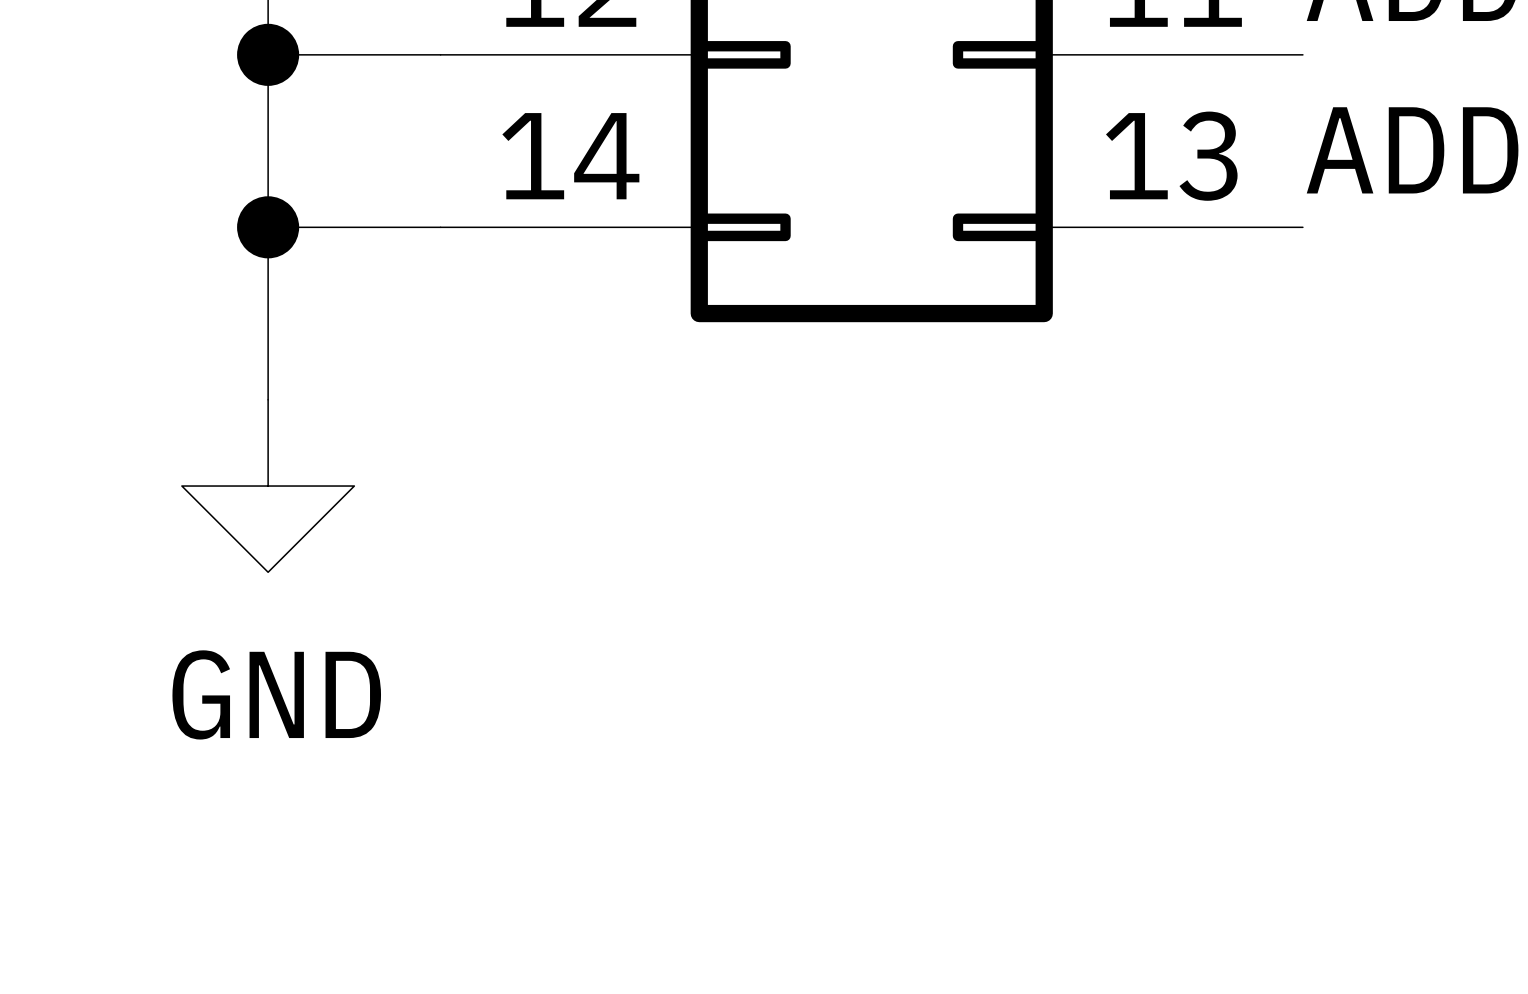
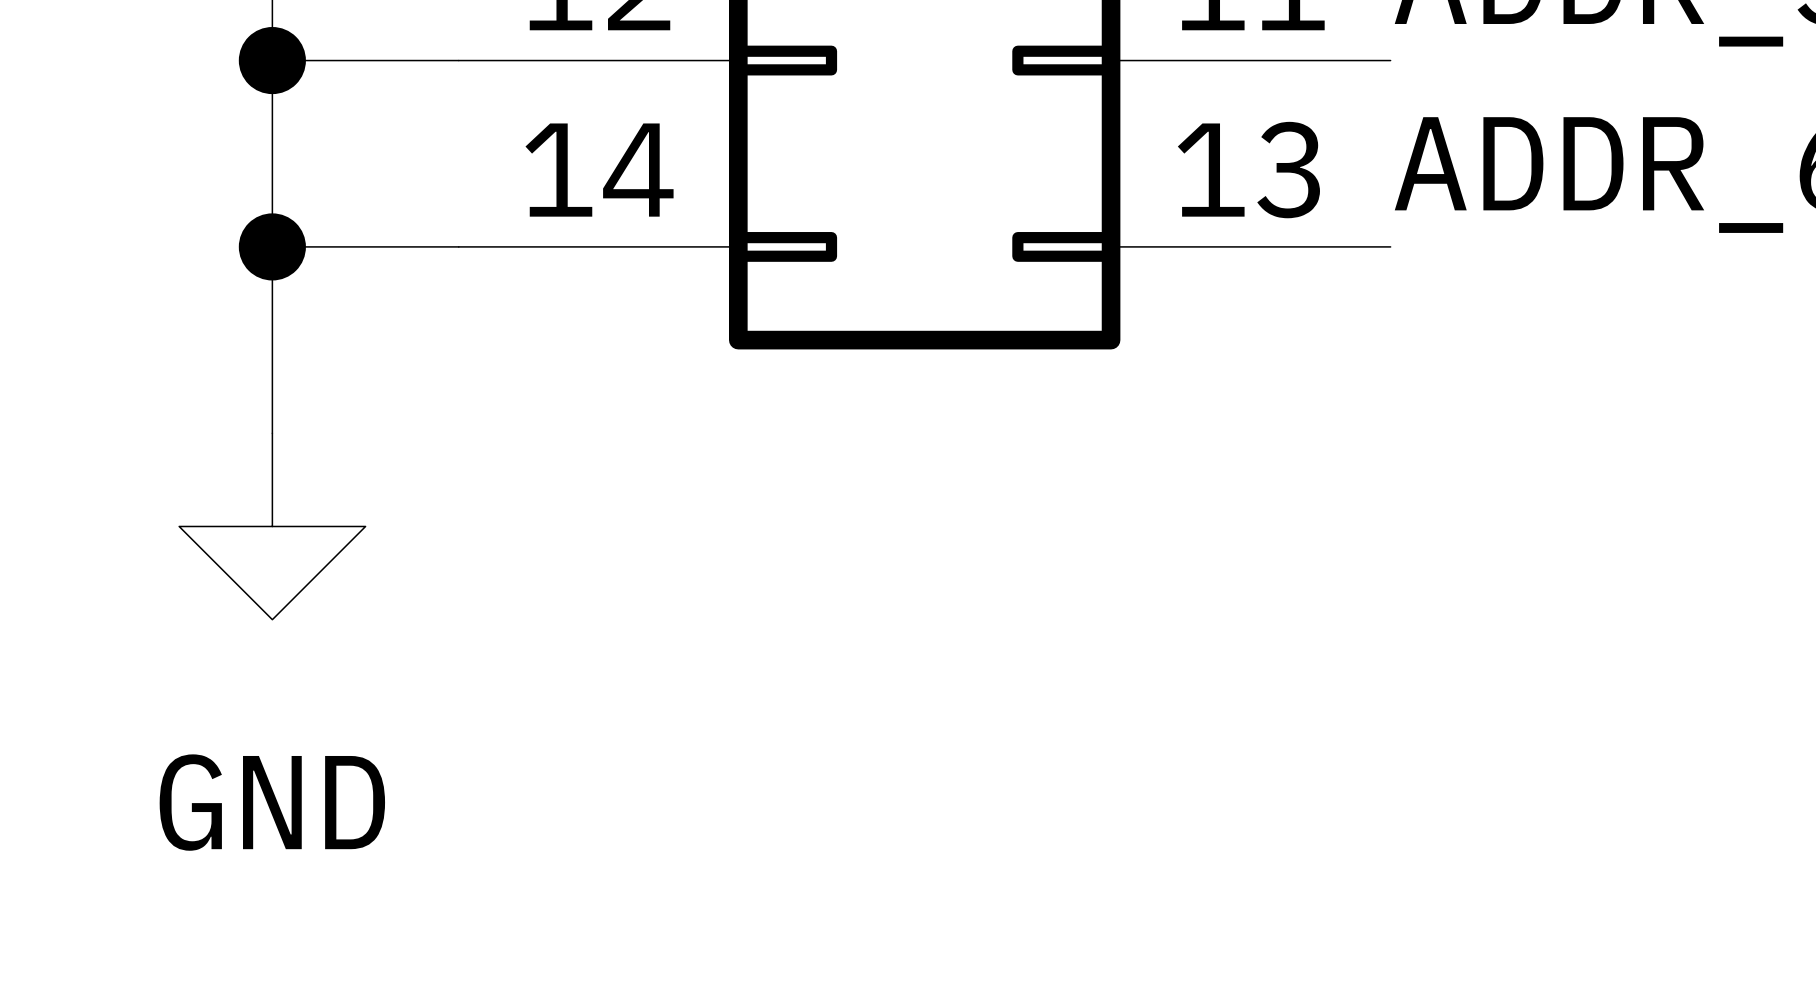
power symbol text position: GND (276, 694) -> GND (272, 802)

